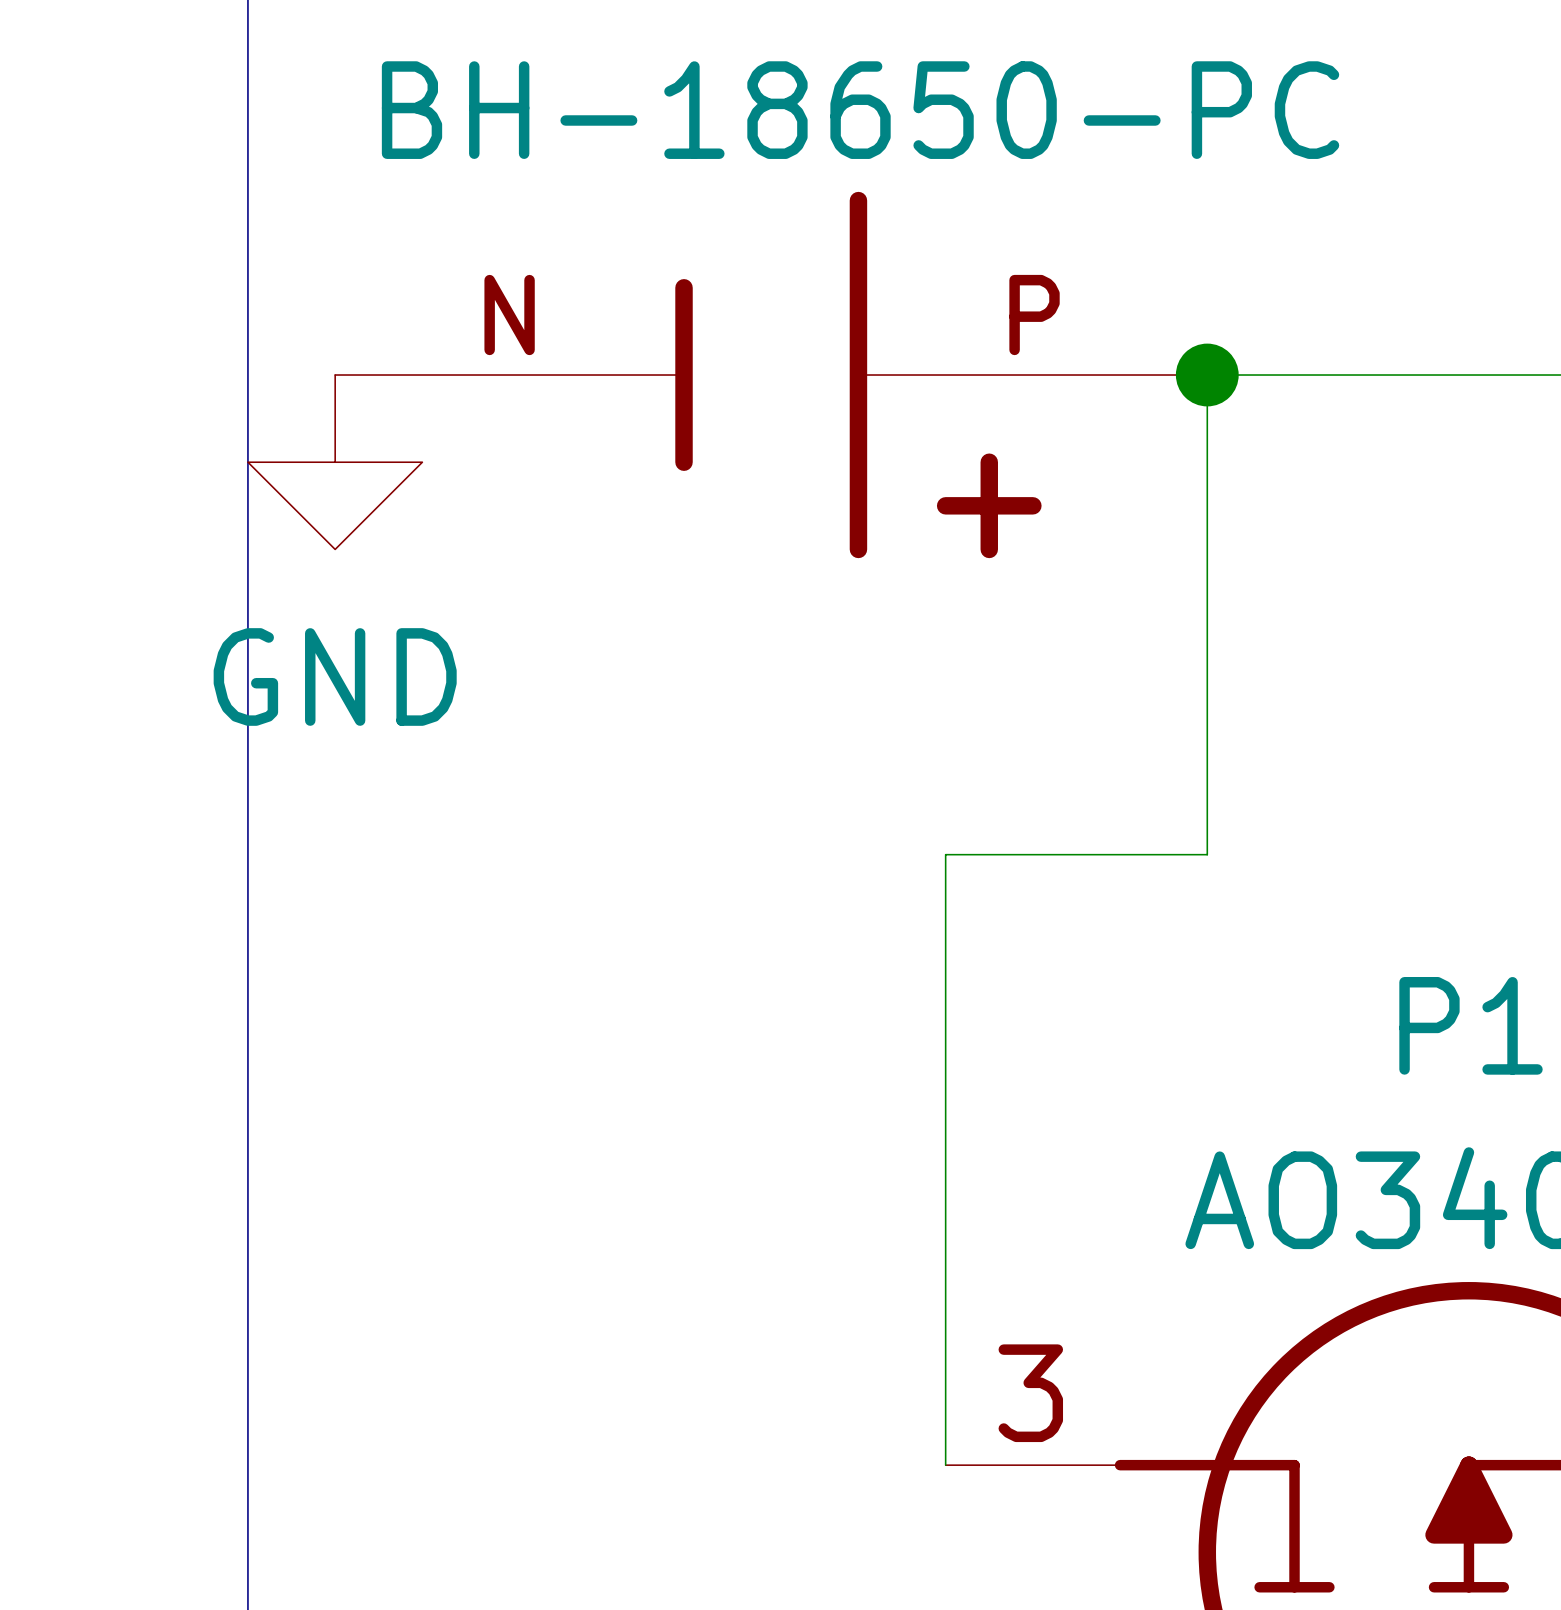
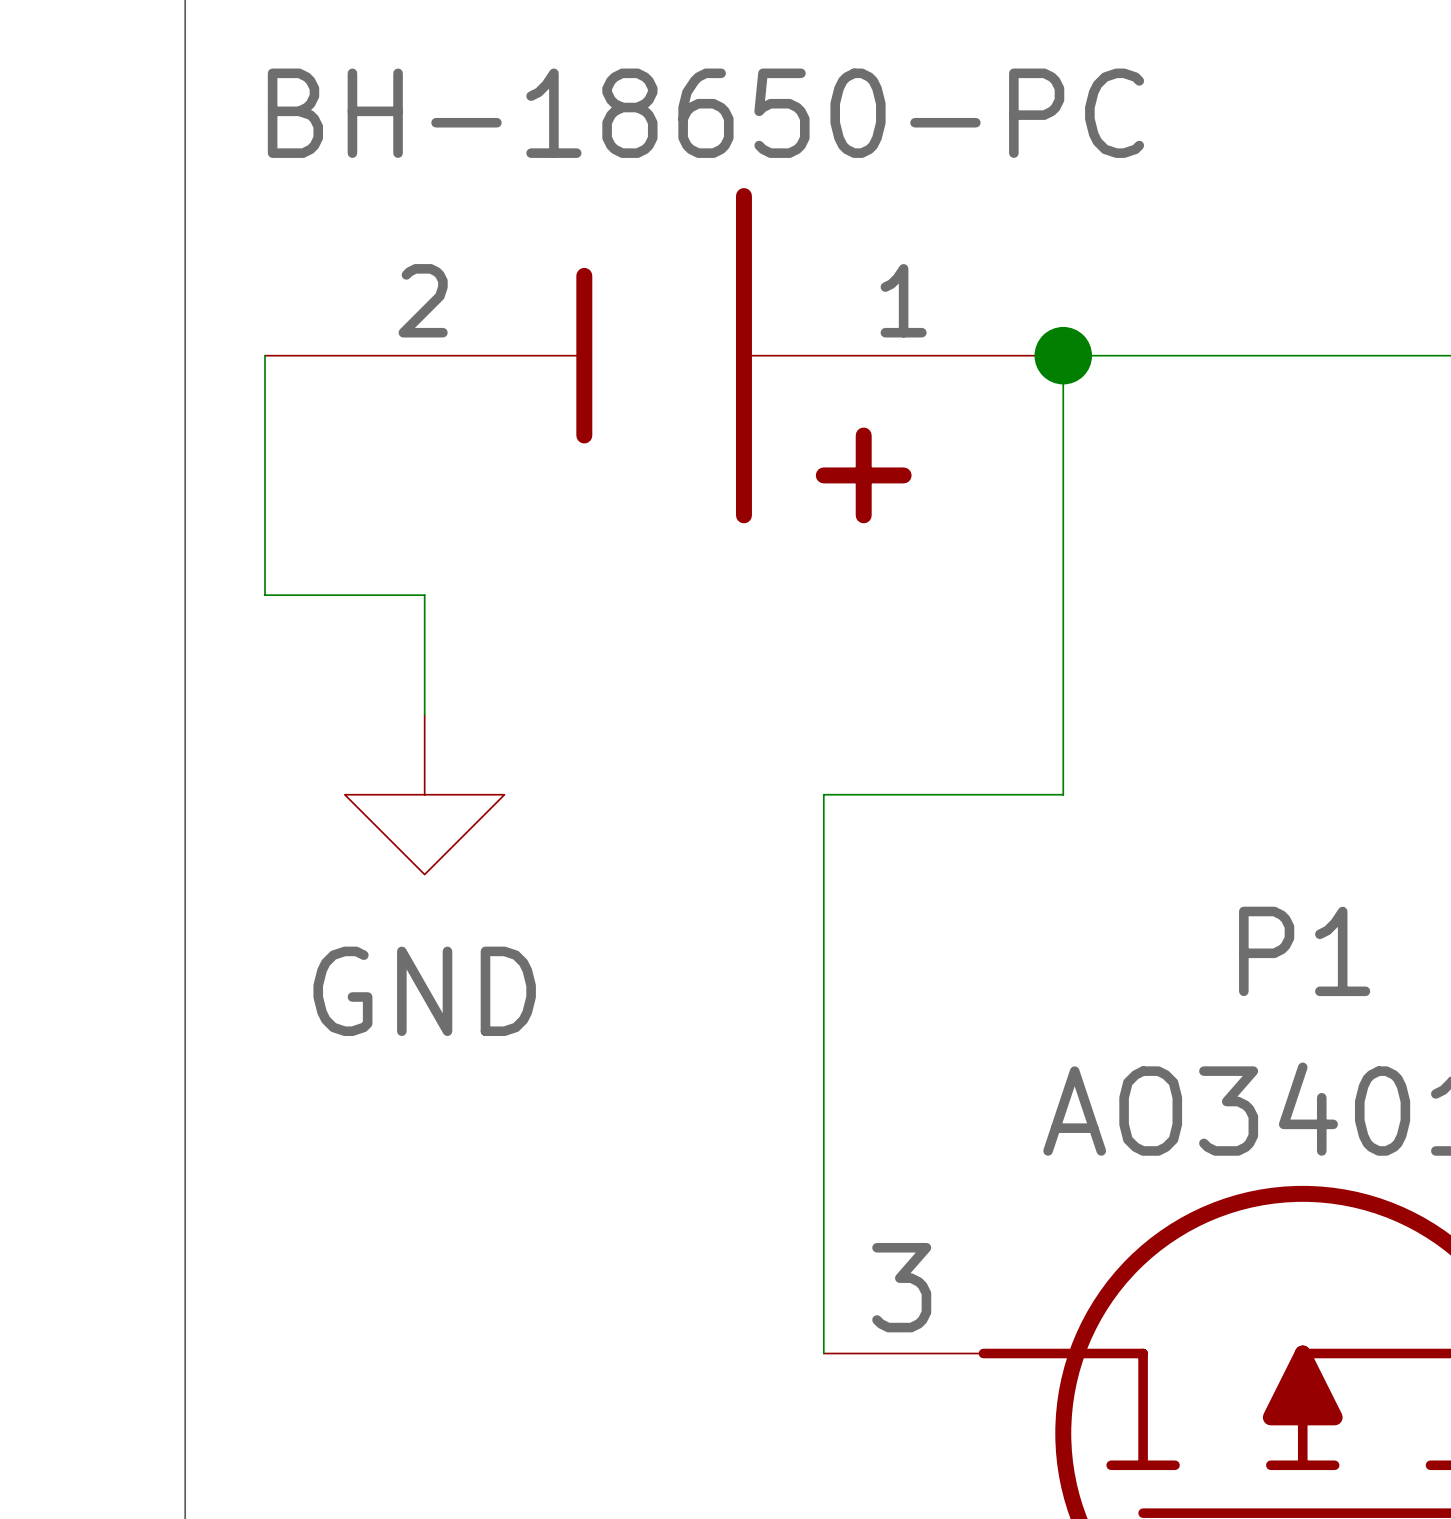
part value position: BH-18650-PC (860, 110) -> BH-18650-PC (705, 113)
part pin number: N (509, 315) -> 2 (423, 300)
part pin number: P (1034, 315) -> 1 (903, 300)
wire: none -> (265, 355) (265, 595) (424, 595) (424, 714)
power symbol position: GND (335, 462) -> GND (424, 794)

